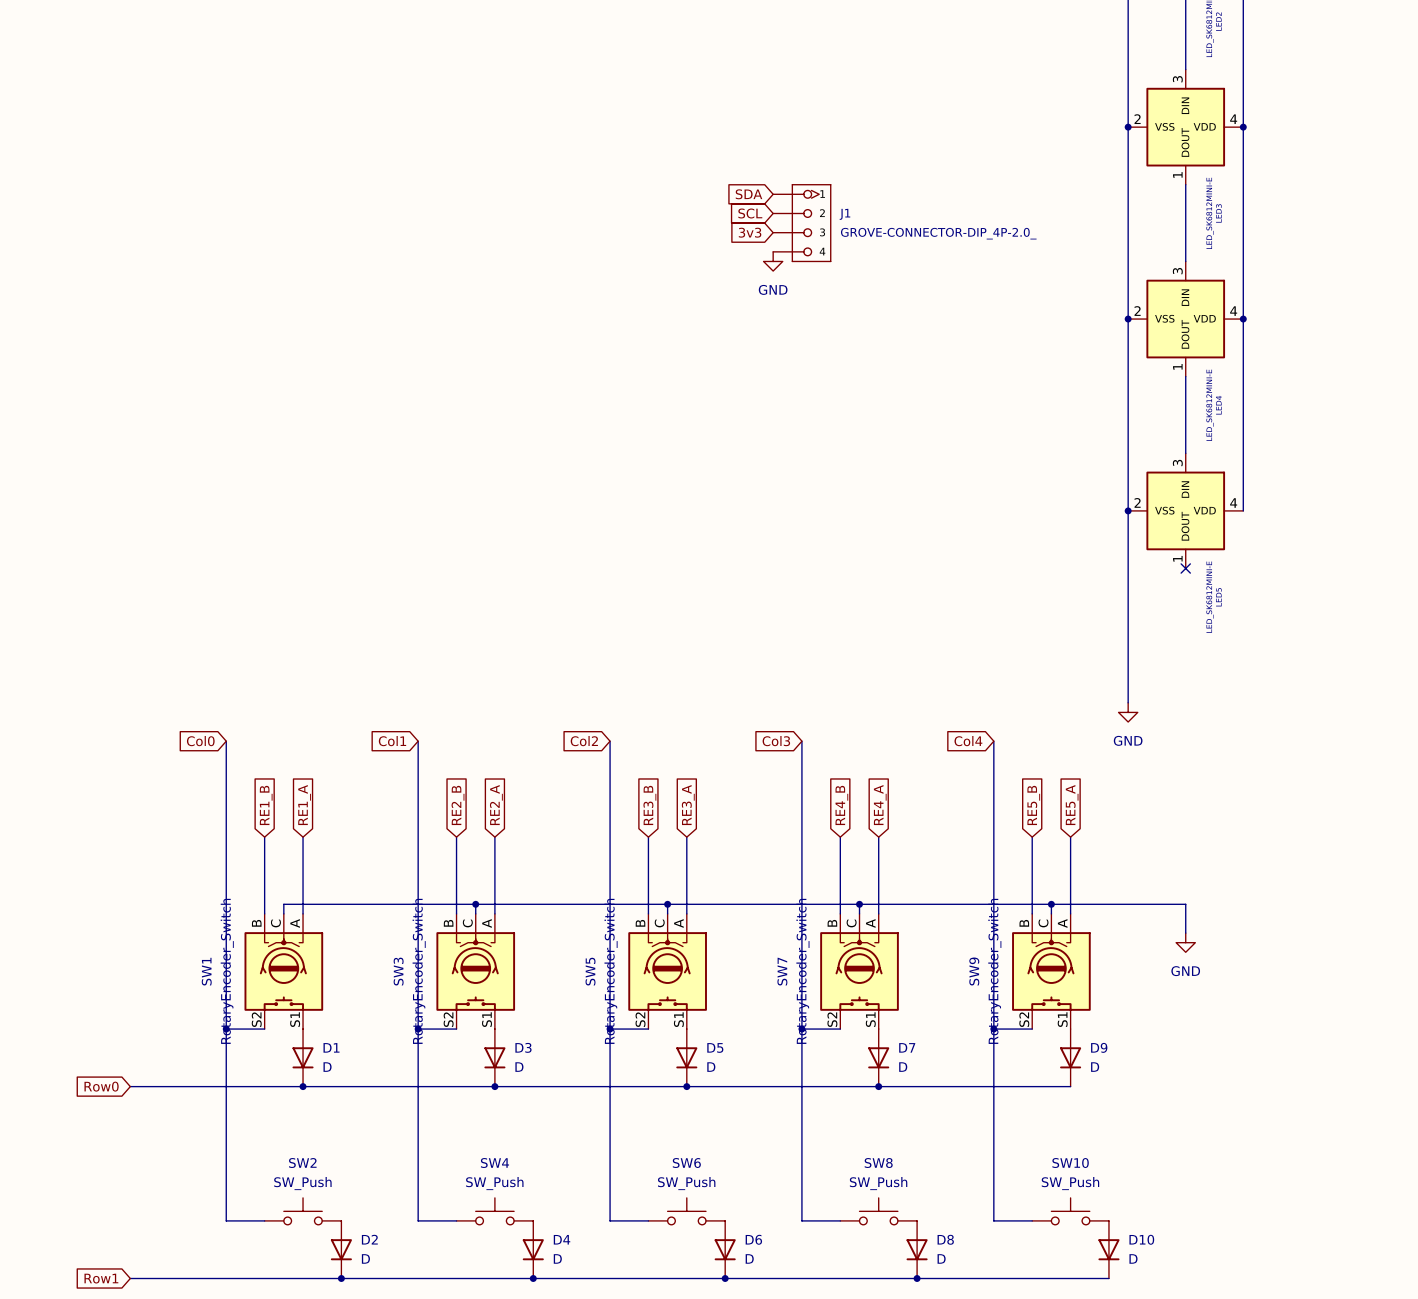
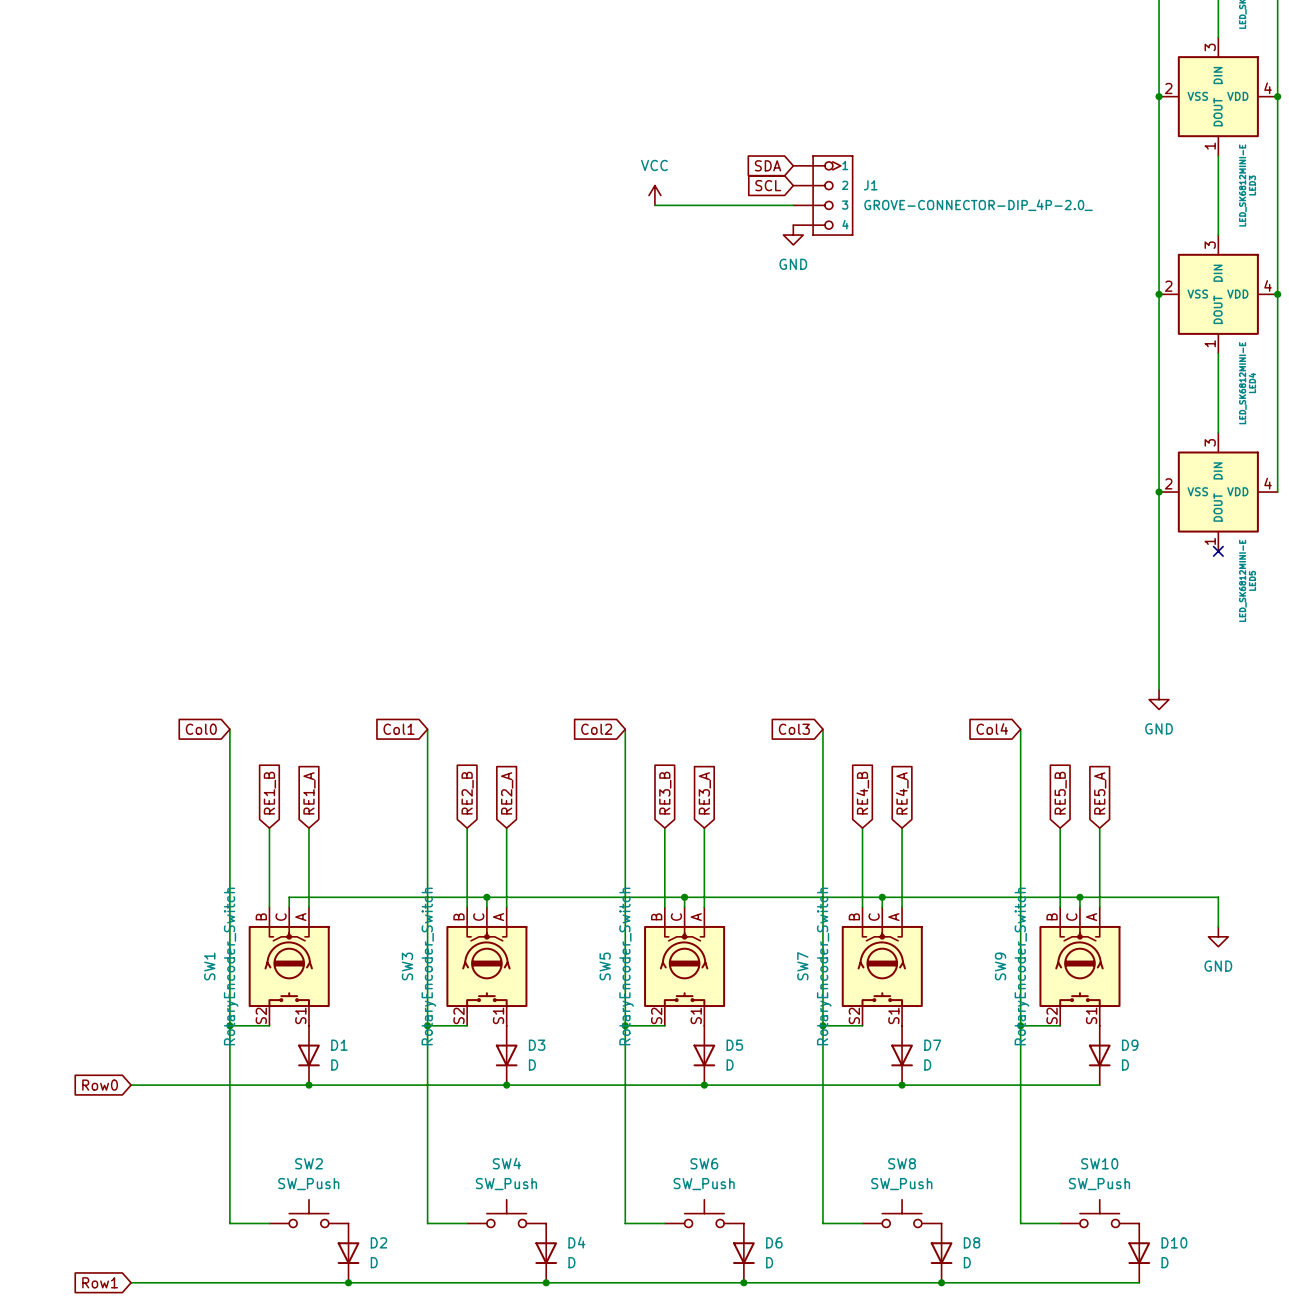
power symbol: none -> VCC (654, 195)
wire: none -> (654, 205) (793, 205)
global label: 3v3 (750, 232) -> none

